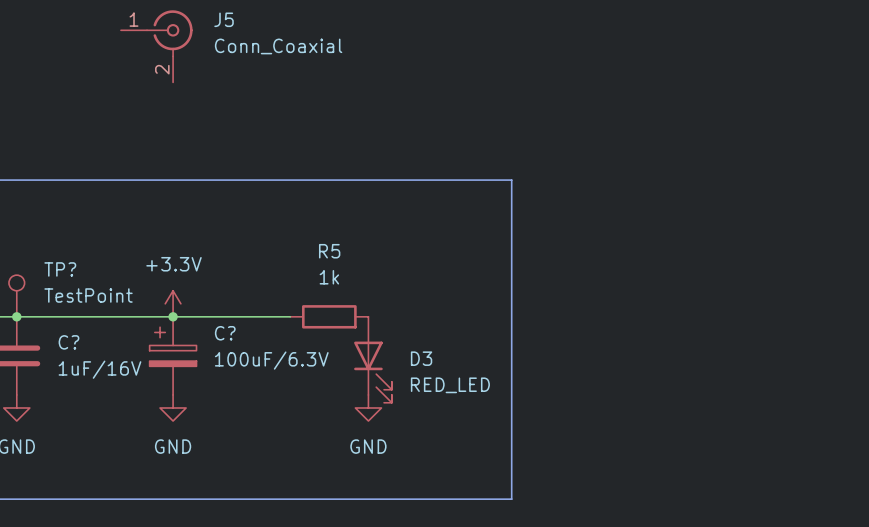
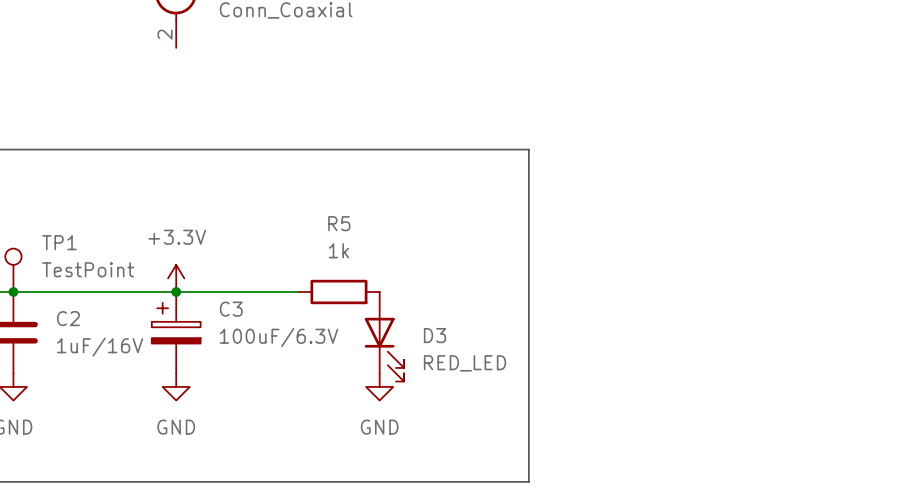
TP? name: TP? (60, 269) -> TP1 (59, 242)
C? name: C? (225, 333) -> C3 (231, 309)
C? name: C? (68, 342) -> C2 (68, 318)

